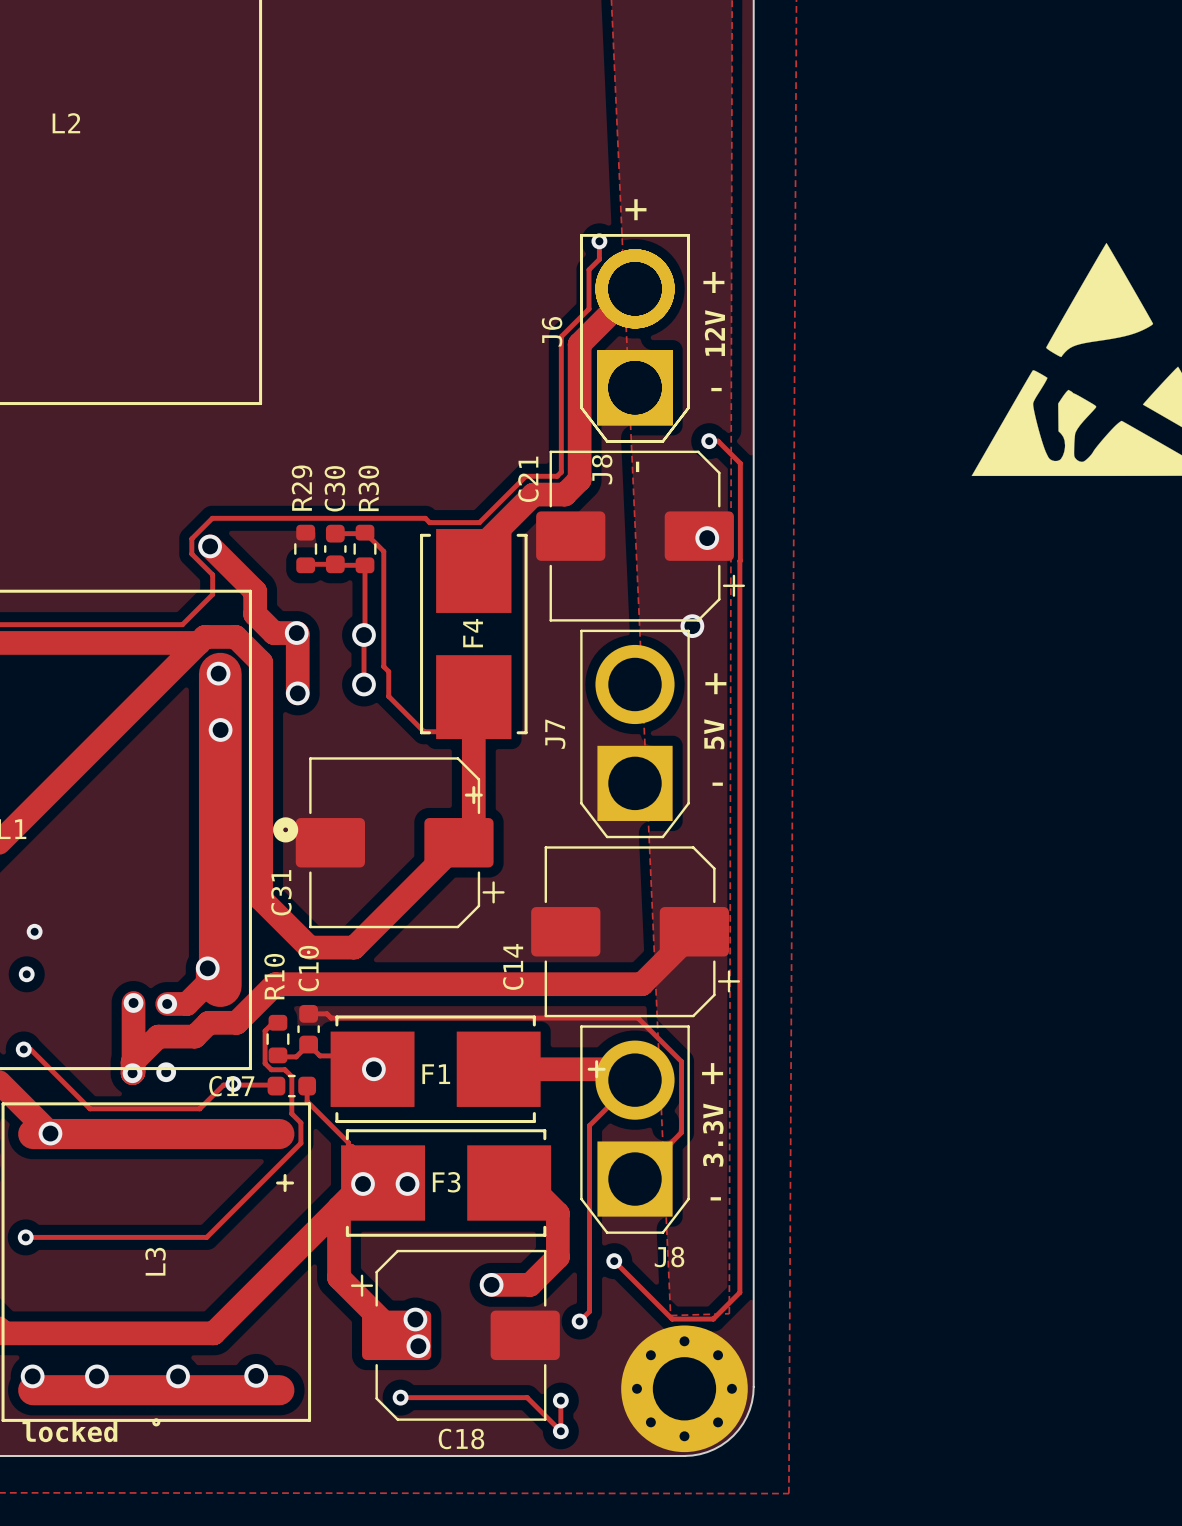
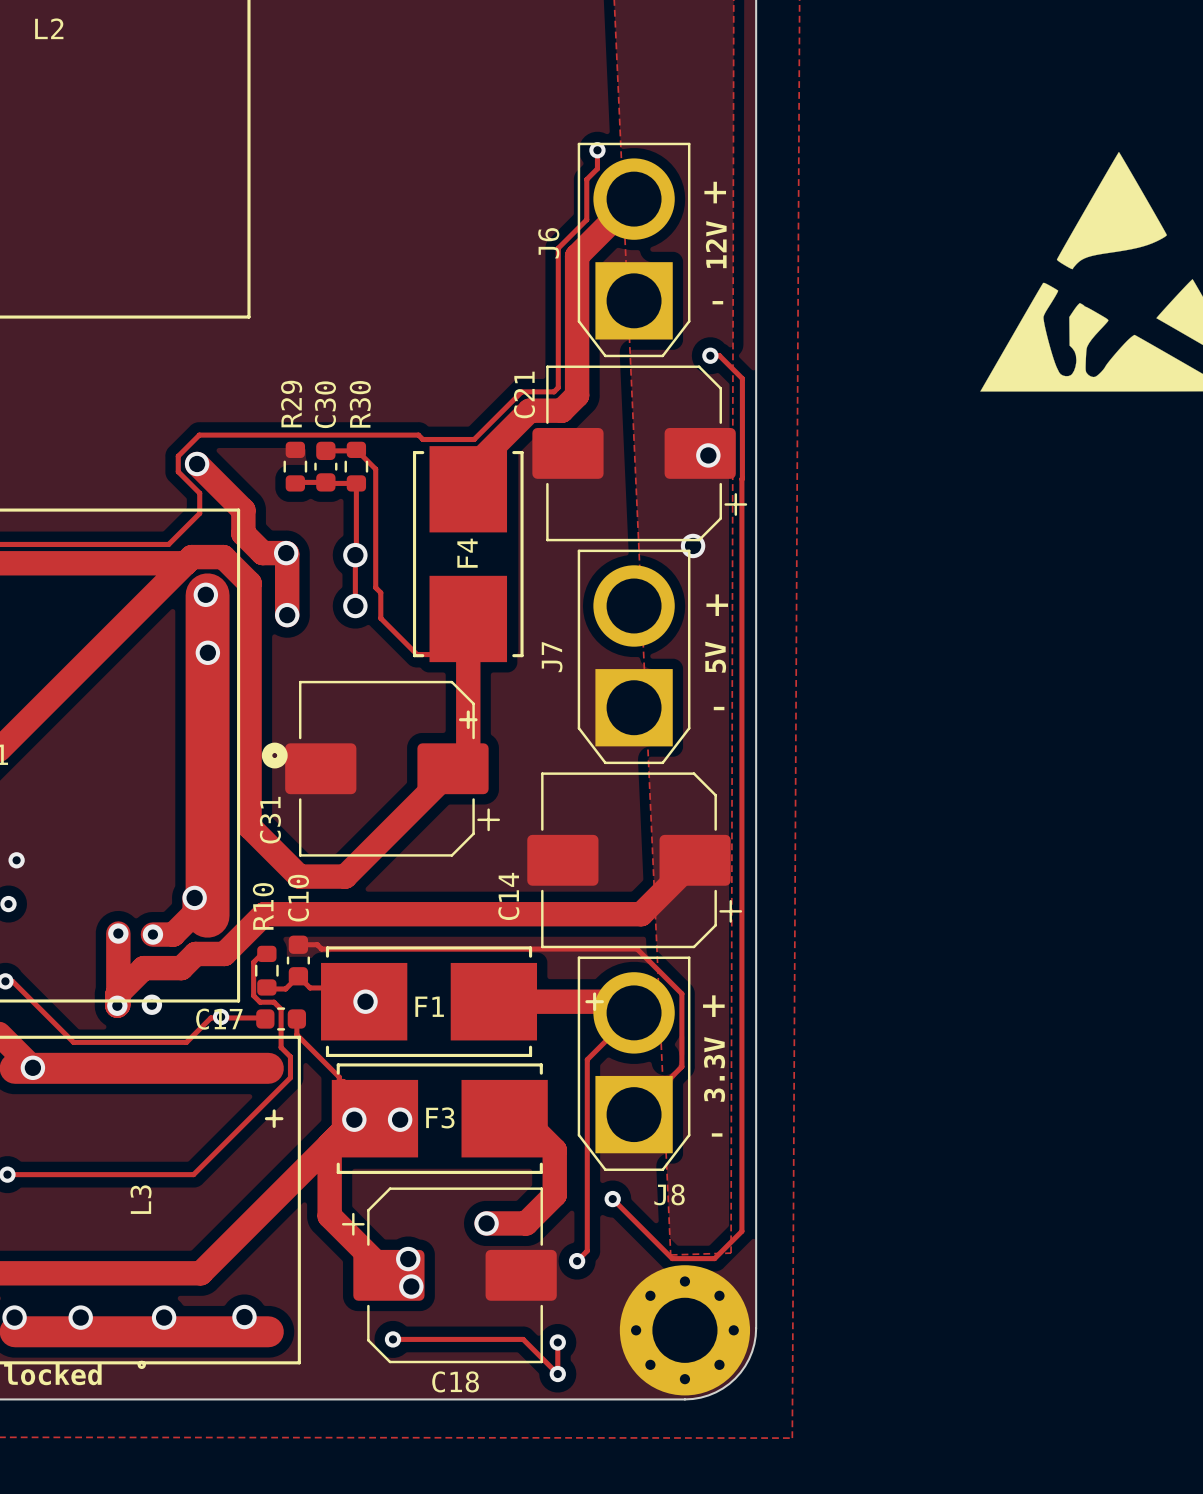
part: (635, 288) -> none
J8: (635, 338) -> none

